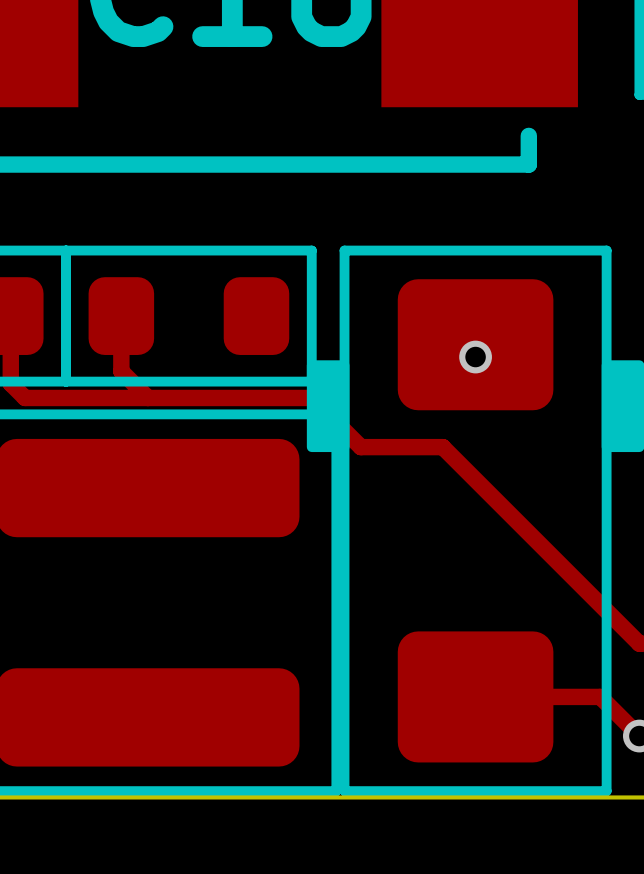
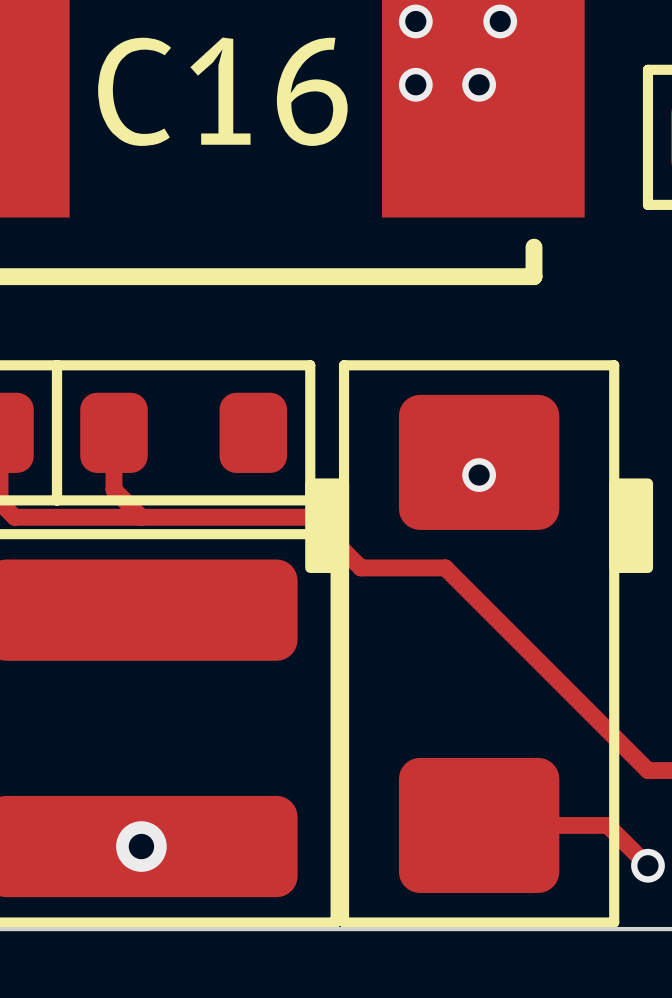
via: none -> (141, 846)

